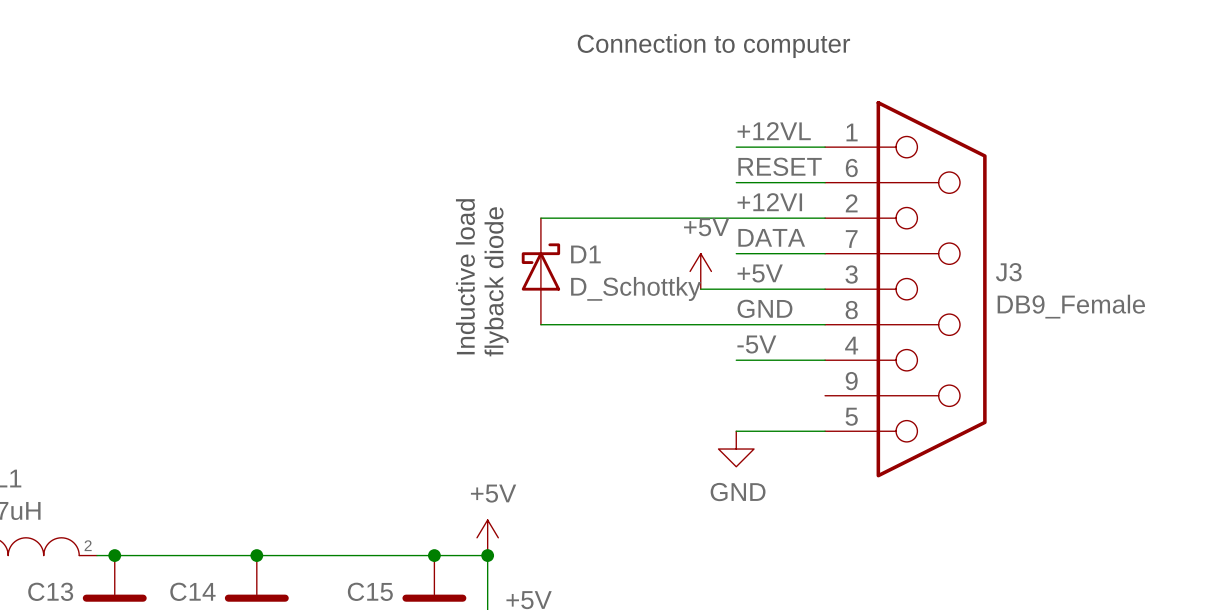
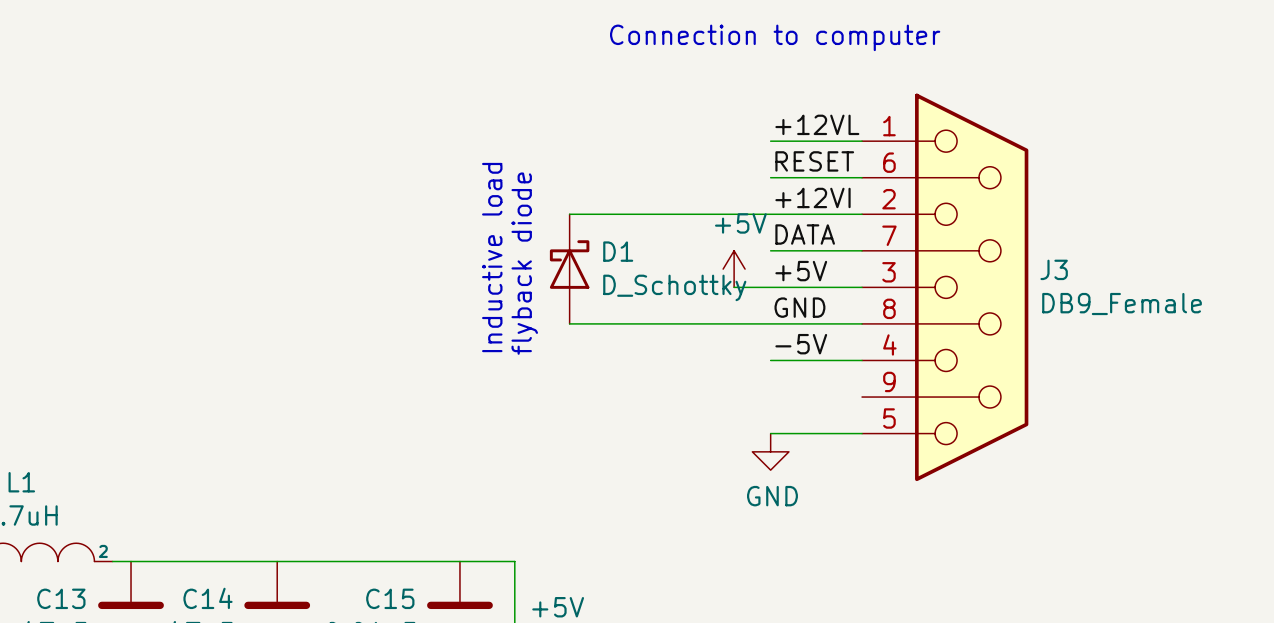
power symbol: +5V (487, 537) -> none
junction: (114, 555) -> none
junction: (256, 555) -> none
junction: (434, 555) -> none
junction: (487, 555) -> none

